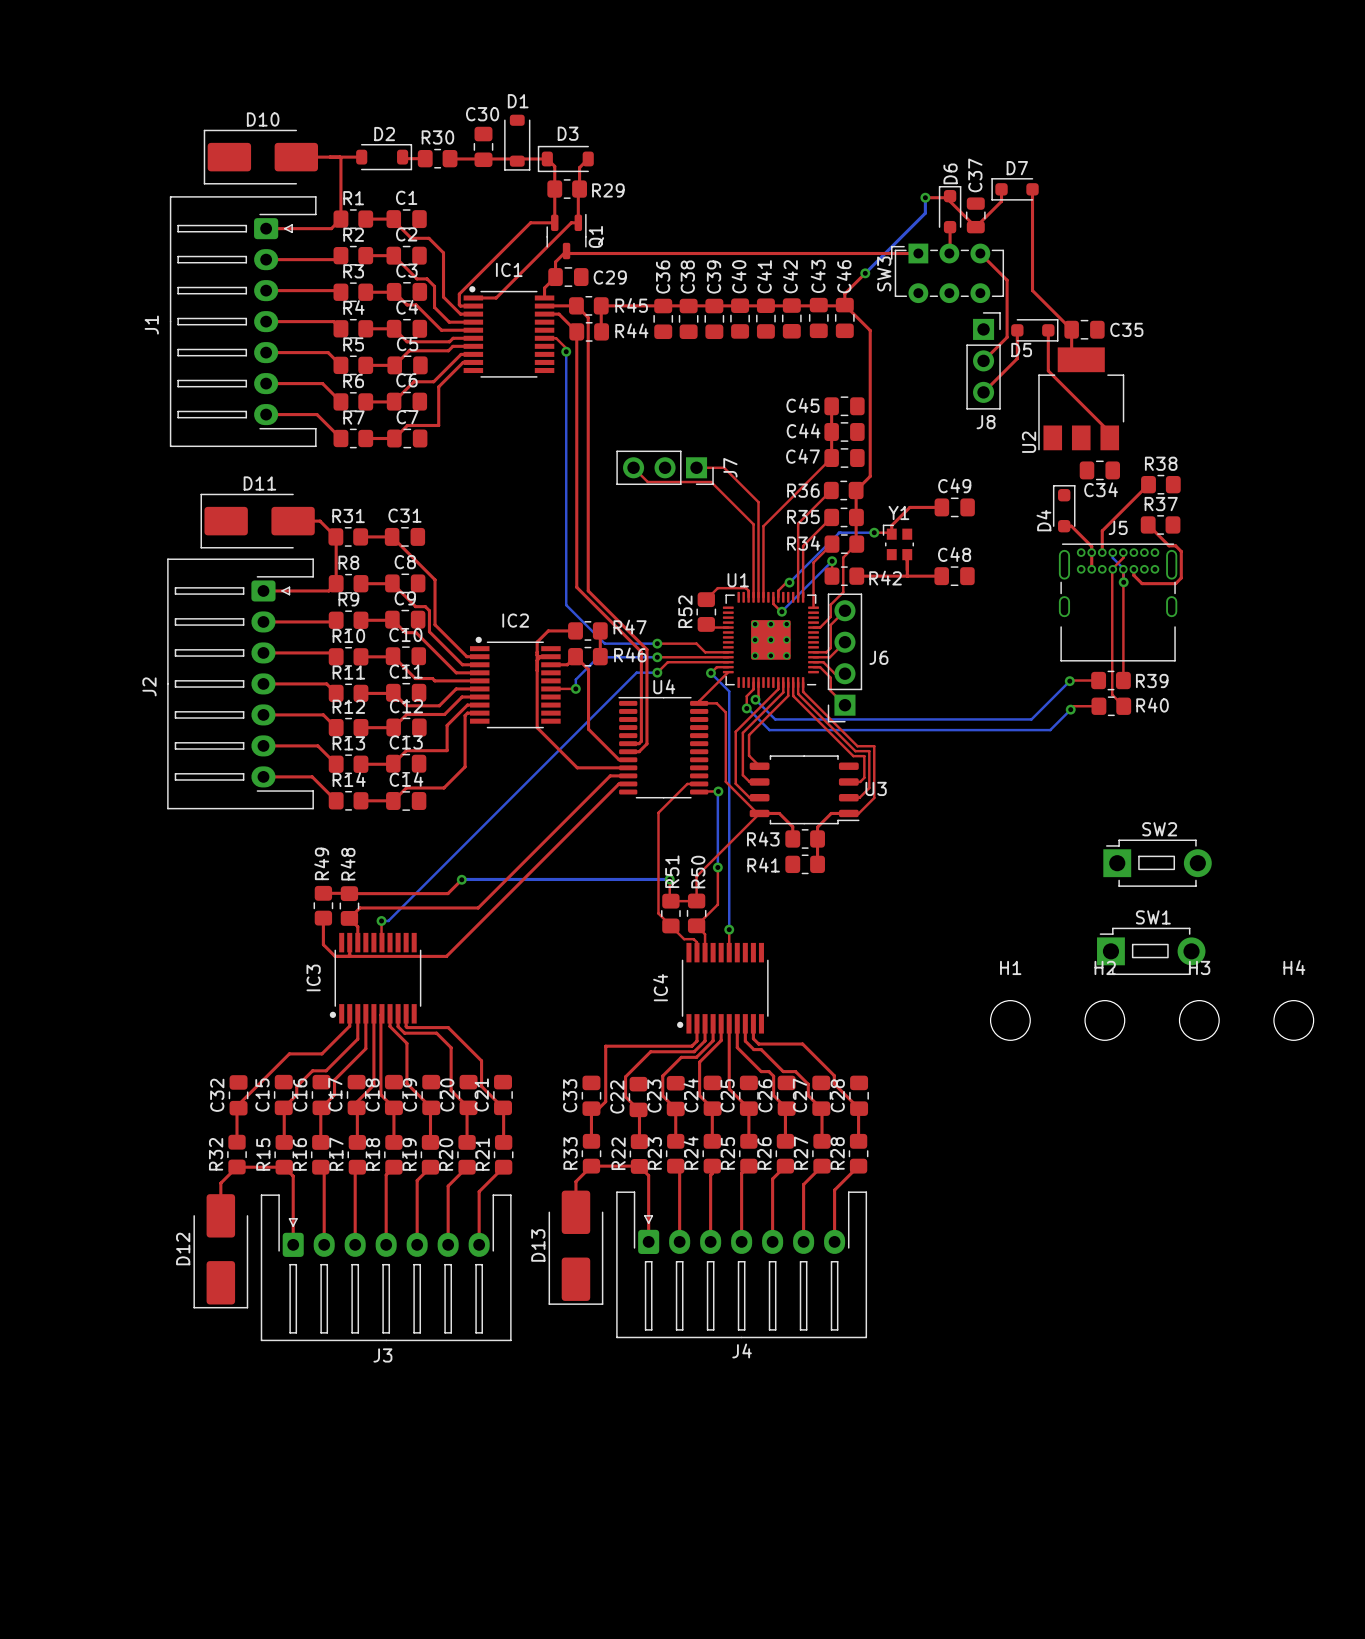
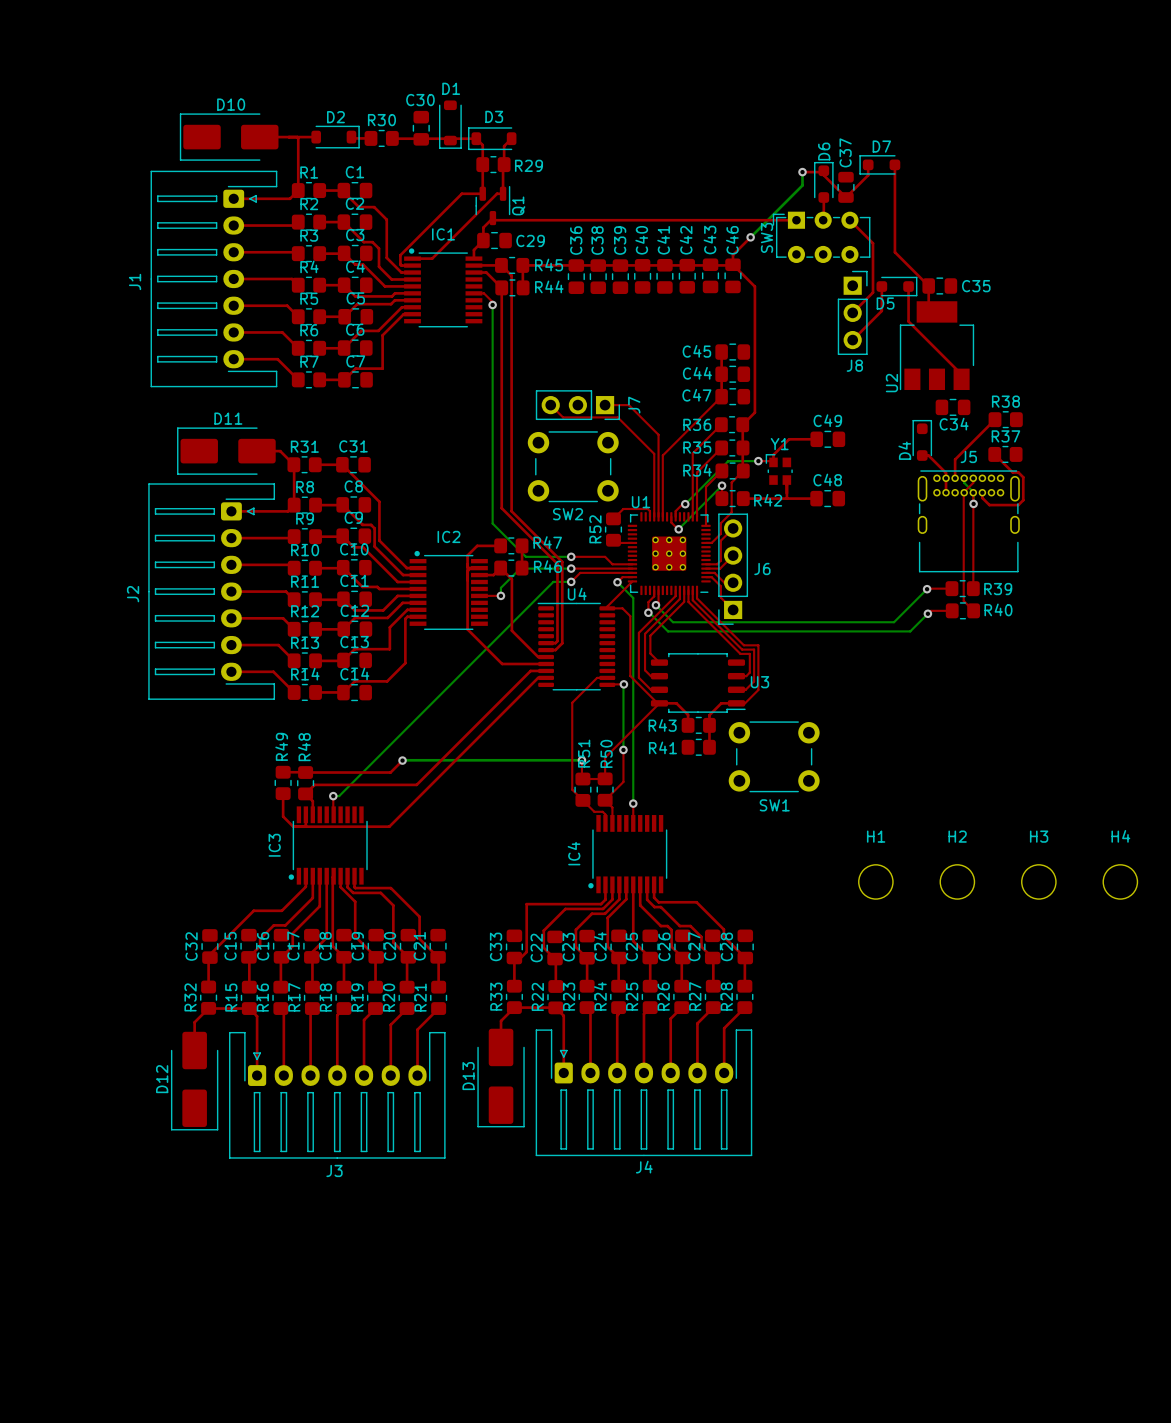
SW2 name position: SW2 (1159, 829) -> SW2 (568, 514)
SW2 footprint: [1103, 839, 1212, 887] -> [527, 431, 619, 503]
SW1 name position: SW1 (1153, 917) -> SW1 (774, 805)
SW1 footprint: [1097, 927, 1206, 976] -> [728, 721, 820, 793]

